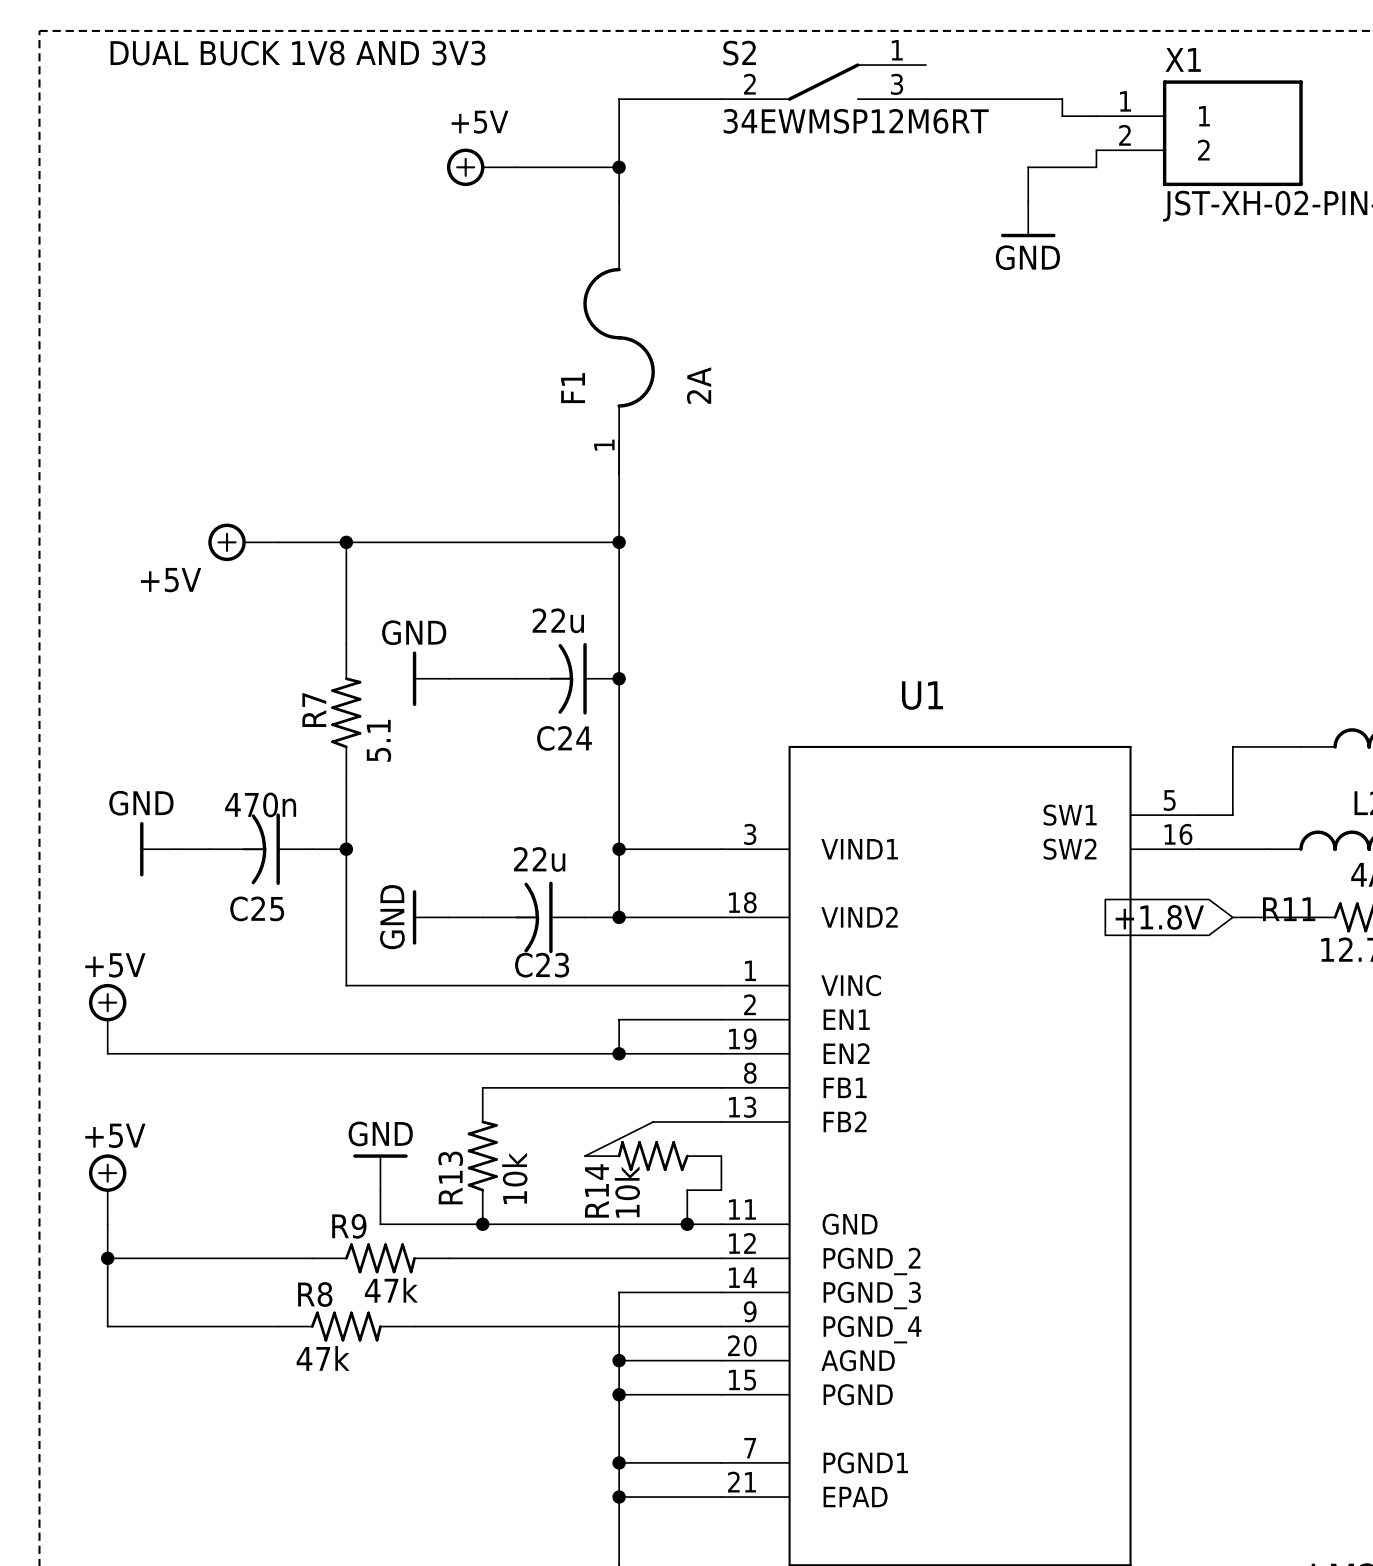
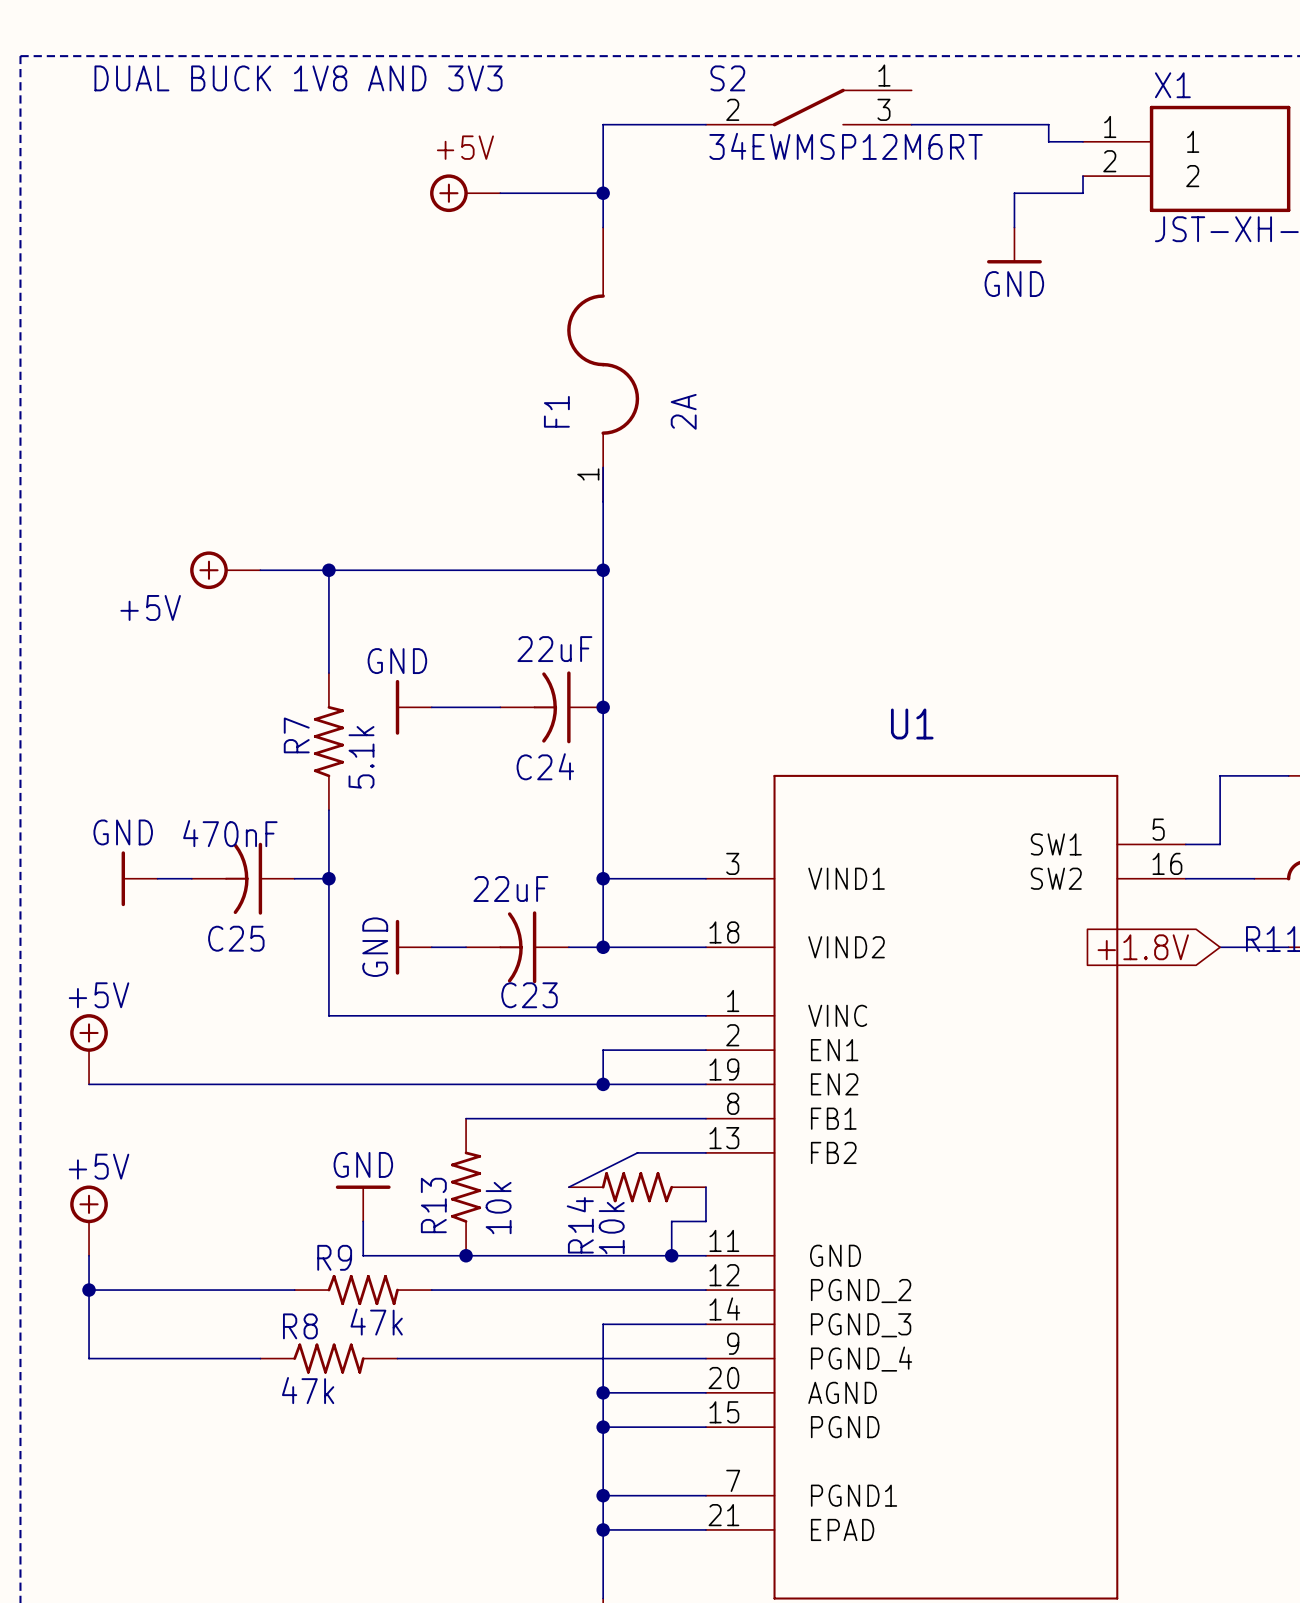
C24 value: 22u (558, 620) -> 22uF (554, 649)
R7 value: 5.1 (378, 740) -> 5.1k (361, 757)
C25 value: 470n (260, 804) -> 470nF (230, 833)
C23 value: 22u (539, 859) -> 22uF (510, 889)

